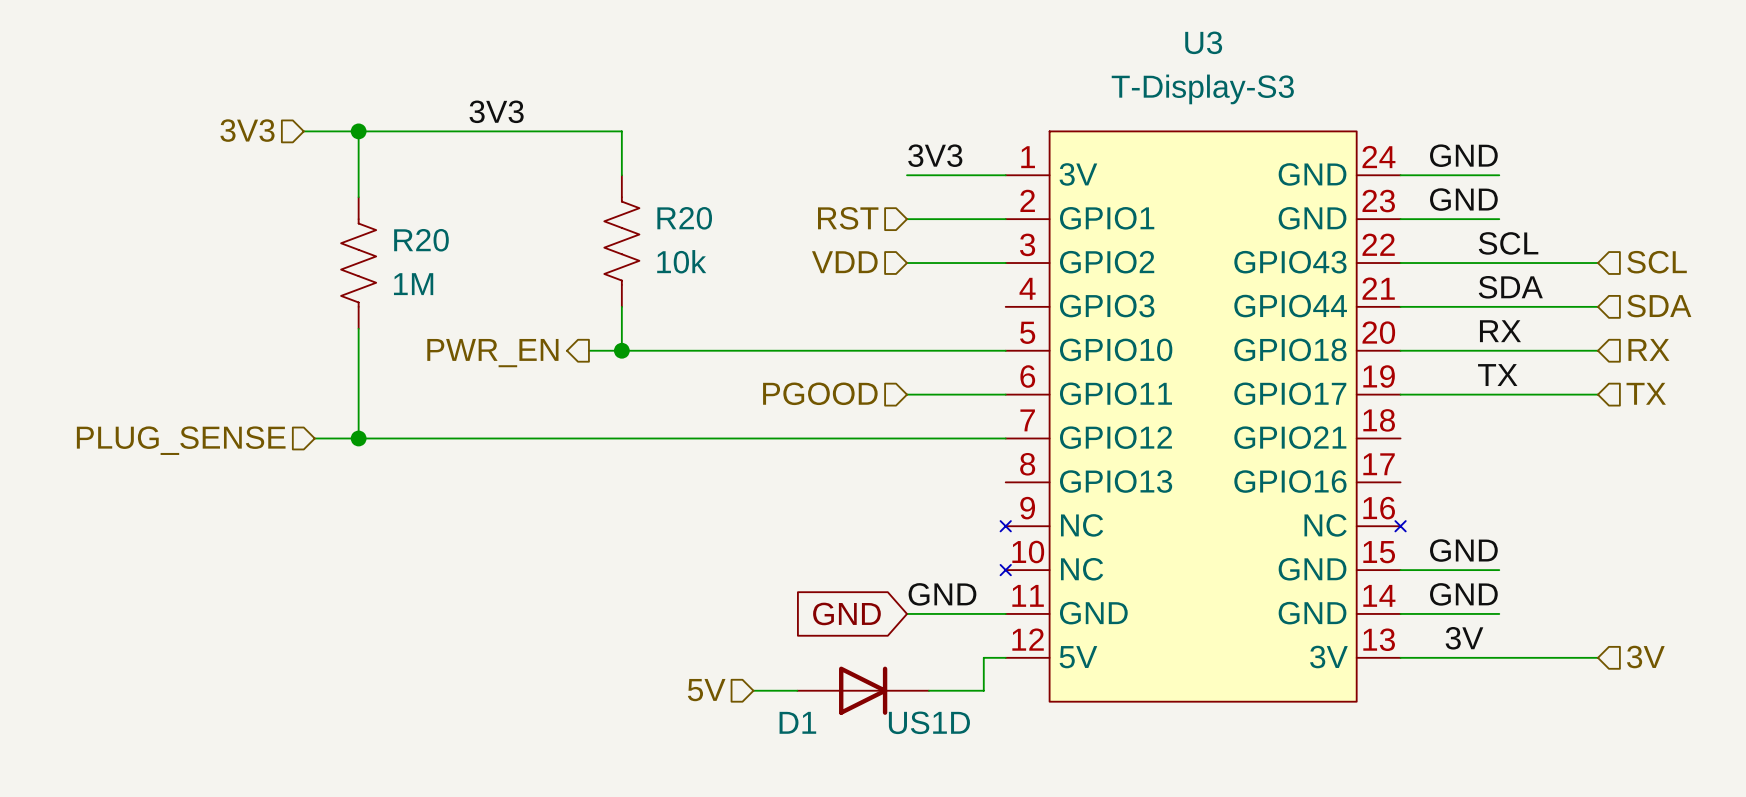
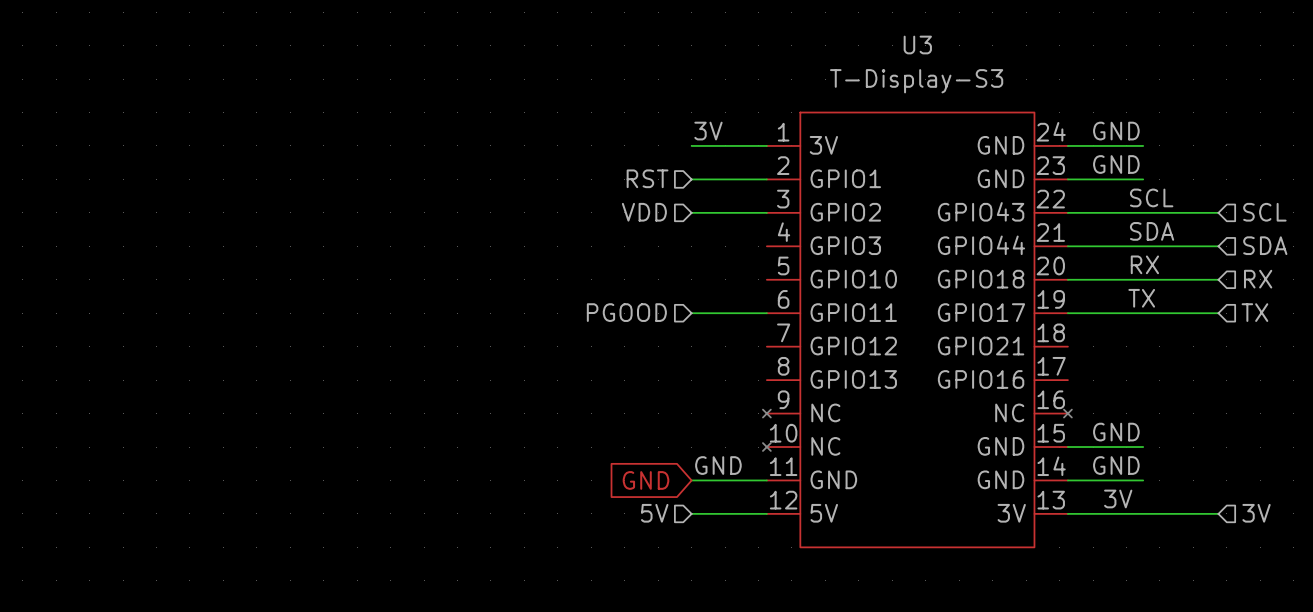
label: 3V3 (496, 111) -> none
hierarchical label: 3V3 (247, 130) -> none
wire: (303, 131) (621, 131) (621, 175) -> none
wire: (358, 131) (358, 197) -> none
junction: (358, 131) -> none
label: 3V3 (935, 155) -> 3V (708, 131)
R20: 10k (621, 241) -> none
R20: 1M (358, 263) -> none
wire: (621, 306) (621, 350) -> none
wire: (358, 328) (358, 438) -> none
wire: (588, 350) (1005, 350) -> none
junction: (621, 350) -> none
hierarchical label: PWR_EN (492, 353) -> none
wire: (314, 438) (1005, 438) -> none
junction: (358, 438) -> none
hierarchical label: PLUG_SENSE (181, 440) -> none
wire: (983, 657) (983, 690) (928, 690) -> (750, 513) (691, 513)
hierarchical label position: 5V (706, 690) -> 5V (654, 513)
wire: (753, 690) (797, 690) -> none
D1: US1D (863, 690) -> none

